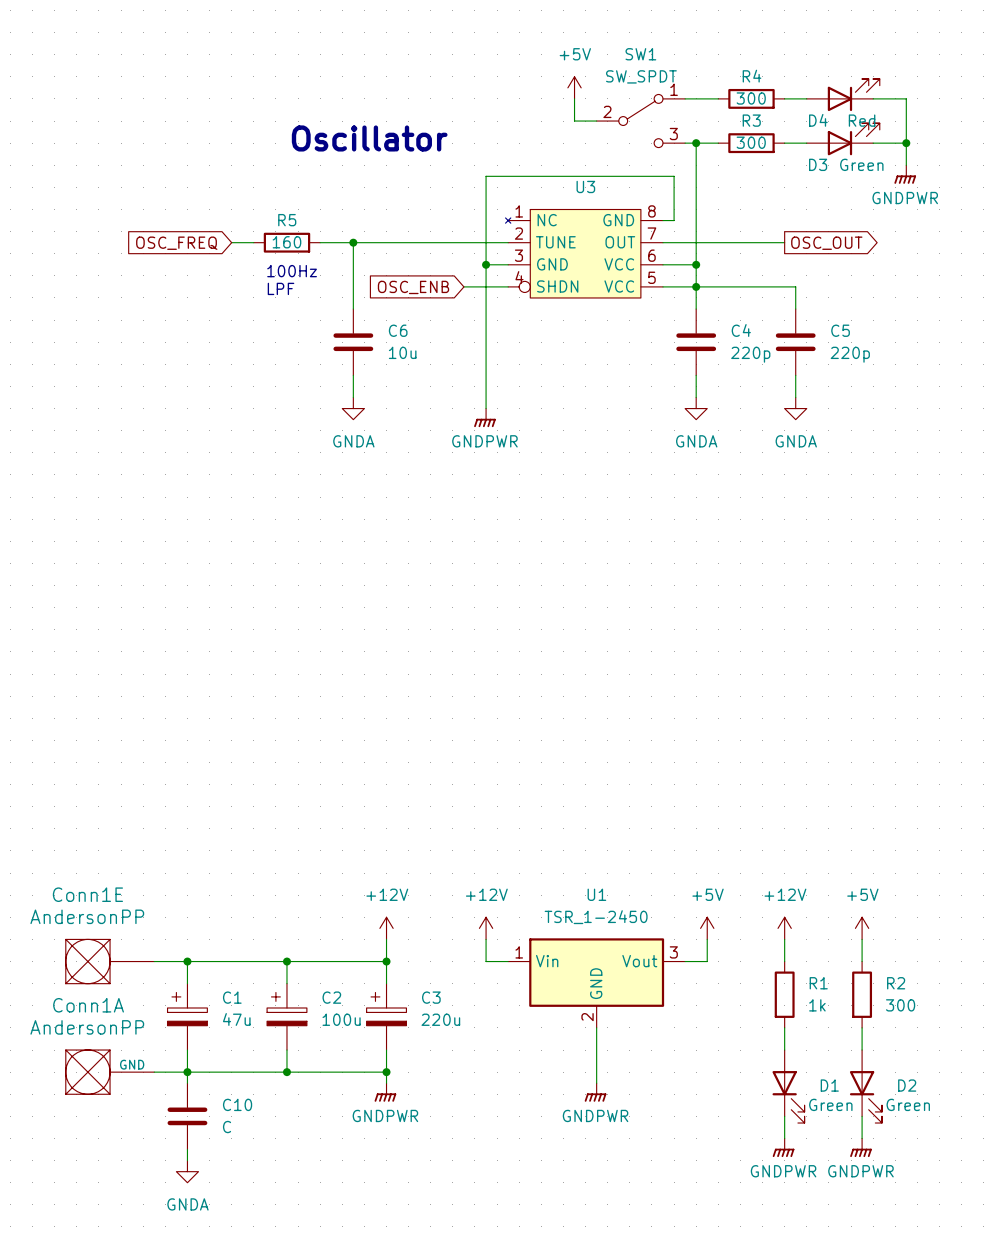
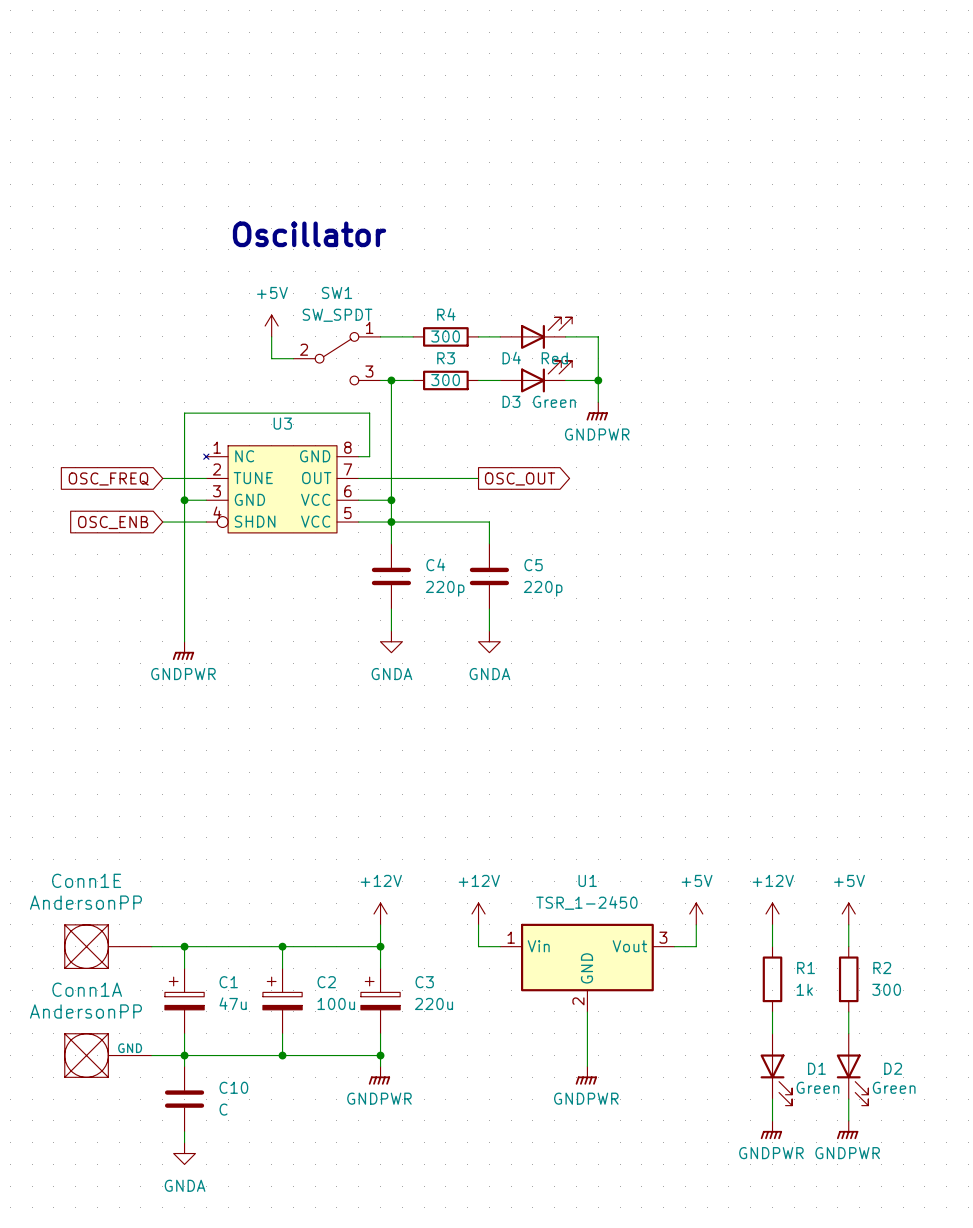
power symbol: +5V (574, 87) -> none
D4 position: (843, 95) -> (536, 333)
wire: (574, 98) (574, 121) (596, 121) -> none
wire: (685, 98) (718, 98) -> none
R4 position: (751, 98) -> (445, 336)
wire: (784, 98) (806, 98) -> none
wire: (873, 98) (906, 98) (906, 165) -> none
SW1 position: (640, 121) -> (336, 358)
text position: Oscillator (369, 138) -> Oscillator (309, 234)
D3 position: (843, 139) -> (536, 376)
wire: (685, 143) (718, 143) -> none
wire: (696, 143) (696, 309) -> none
junction: (696, 143) -> none
R3 position: (751, 143) -> (445, 380)
wire: (784, 143) (806, 143) -> none
wire: (873, 143) (906, 143) -> none
junction: (906, 143) -> none
power symbol: GNDPWR (905, 174) -> none
wire: (663, 220) (674, 220) (674, 176) (486, 176) (486, 408) -> none
wire: (231, 242) (253, 242) -> none
R5: 160 (286, 242) -> none
wire: (320, 242) (508, 242) -> none
wire: (353, 242) (353, 309) -> none
junction: (353, 242) -> none
wire: (663, 242) (784, 242) -> none
global label: OSC_FREQ (176, 243) -> none
global label: OSC_OUT (826, 243) -> none
U3 position: (584, 253) -> (281, 489)
wire: (486, 264) (508, 264) -> (478, 336) (500, 336)
junction: (486, 264) -> none
wire: (663, 264) (696, 264) -> (565, 380) (598, 380)
junction: (696, 264) -> none
text: 100Hz (292, 271) -> none
wire: (463, 286) (508, 286) -> none
wire: (663, 286) (795, 286) (795, 309) -> none
junction: (696, 286) -> none
global label: OSC_ENB (413, 287) -> none
text: LPF (281, 288) -> none
power symbol: none -> +5V (271, 326)
wire: none -> (271, 336) (271, 358) (293, 358)
C6: 10u (353, 342) -> none
wire: none -> (380, 336) (413, 336)
wire: none -> (565, 336) (598, 336) (598, 402)
C4 position: (696, 342) -> (391, 576)
C5 position: (795, 342) -> (489, 576)
wire: (353, 375) (353, 397) -> none
wire: (696, 375) (696, 397) -> none
wire: (795, 375) (795, 397) -> none
wire: none -> (380, 380) (413, 380)
wire: none -> (391, 380) (391, 543)
junction: none -> (391, 380)
wire: none -> (478, 380) (500, 380)
junction: none -> (598, 380)
power symbol: GNDA (353, 408) -> none
power symbol: GNDA (696, 408) -> none
power symbol: GNDA (795, 408) -> none
power symbol position: GNDPWR (484, 417) -> GNDPWR (597, 411)
wire: none -> (358, 456) (369, 456) (369, 413) (184, 413) (184, 641)
wire: none -> (162, 478) (206, 478)
wire: none -> (358, 478) (478, 478)
global label: none -> OSC_FREQ (108, 478)
global label: none -> OSC_OUT (520, 478)
wire: none -> (184, 500) (206, 500)
junction: none -> (184, 500)
wire: none -> (358, 500) (391, 500)
junction: none -> (391, 500)
global label: none -> OSC_ENB (113, 522)
wire: none -> (162, 522) (206, 522)
wire: none -> (358, 522) (489, 522) (489, 543)
junction: none -> (391, 522)
wire: none -> (391, 609) (391, 630)
wire: none -> (489, 609) (489, 630)
power symbol: none -> GNDA (391, 641)
power symbol: none -> GNDA (489, 641)
power symbol: none -> GNDPWR (183, 650)

